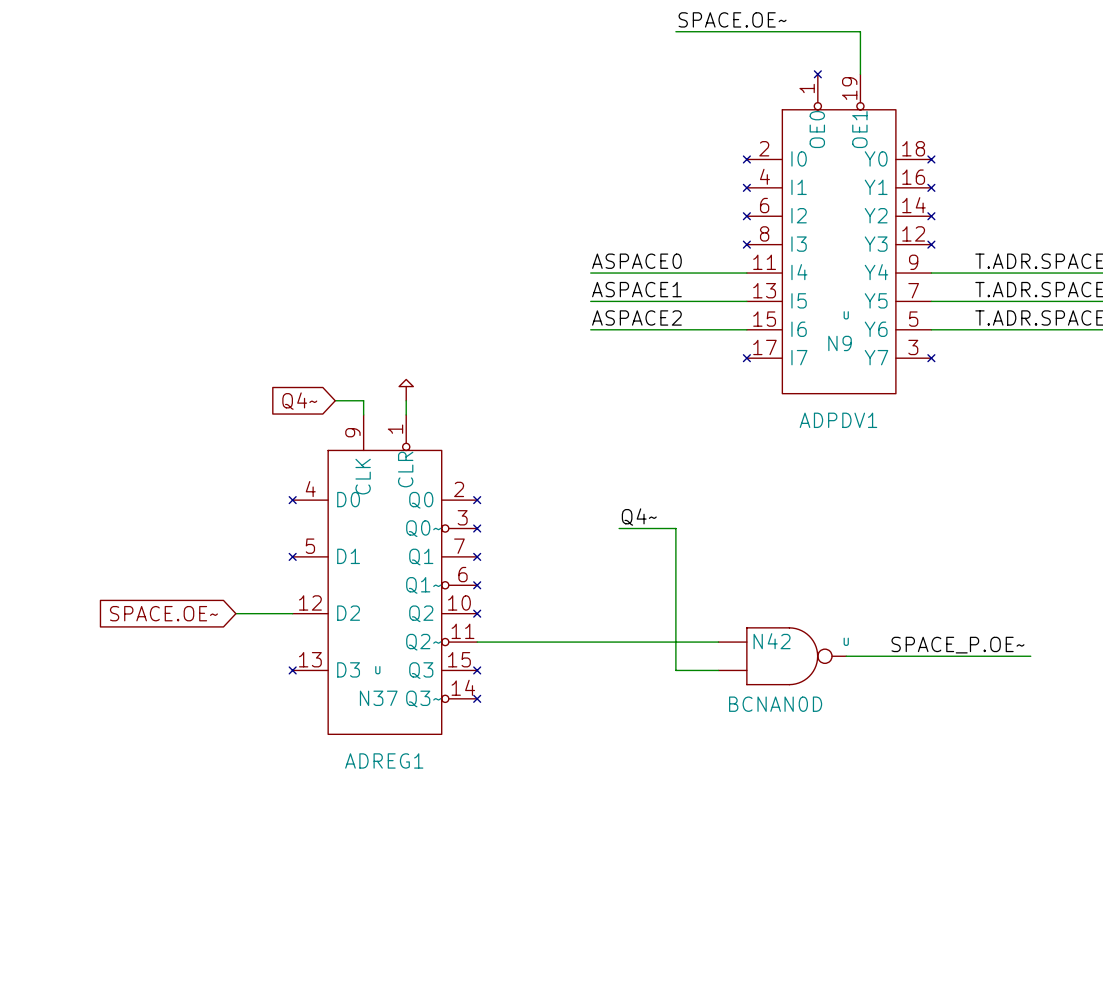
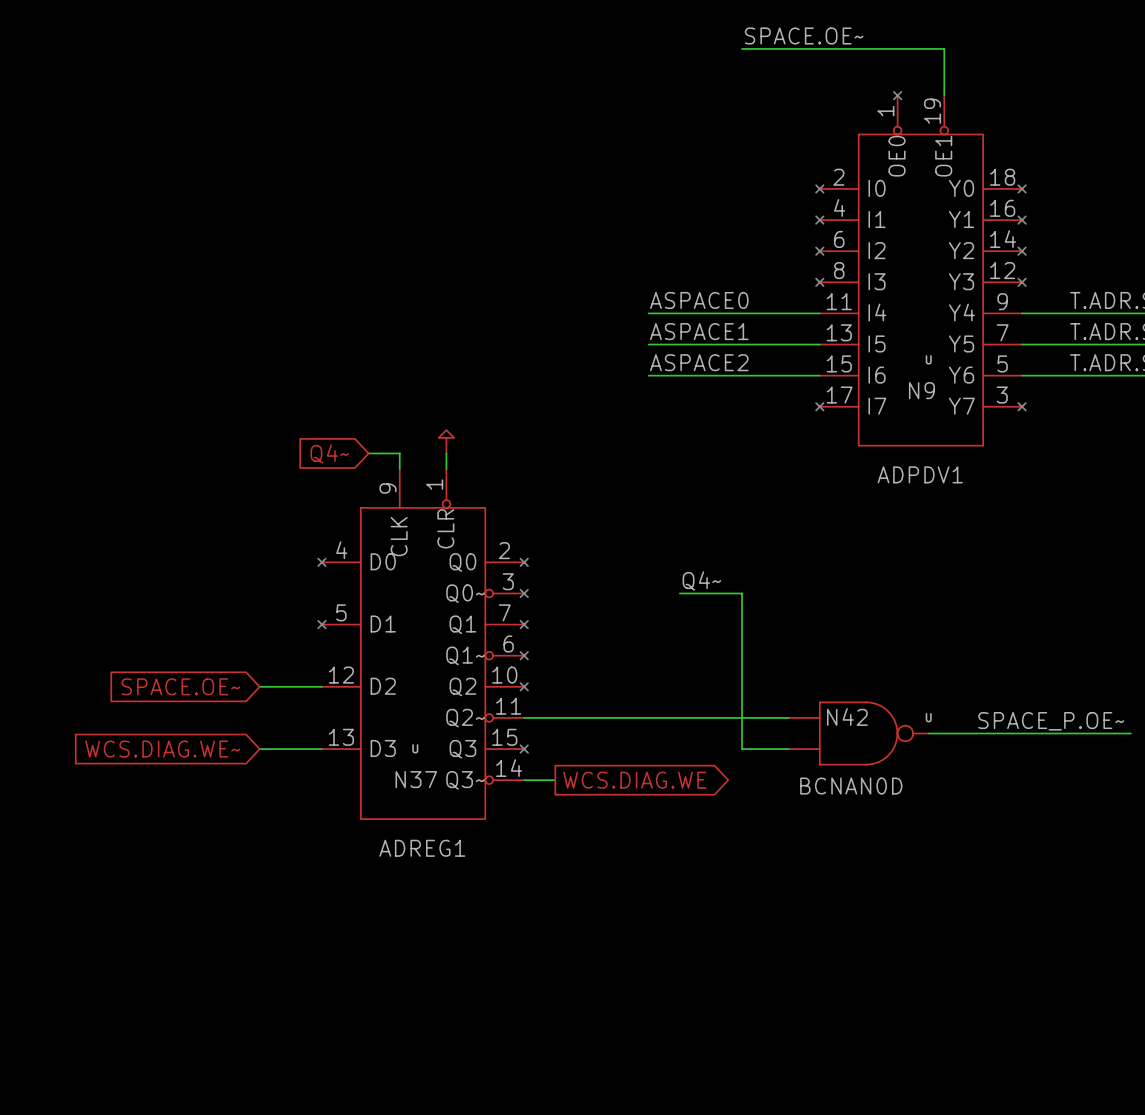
global label: none -> WCS.DIAG.WE~ (162, 749)
wire: none -> (259, 749) (321, 749)
no-connect mark: (292, 670) -> none
wire: none -> (524, 780) (555, 780)
no-connect mark: (477, 698) -> none
global label: none -> WCS.DIAG.WE (634, 780)

